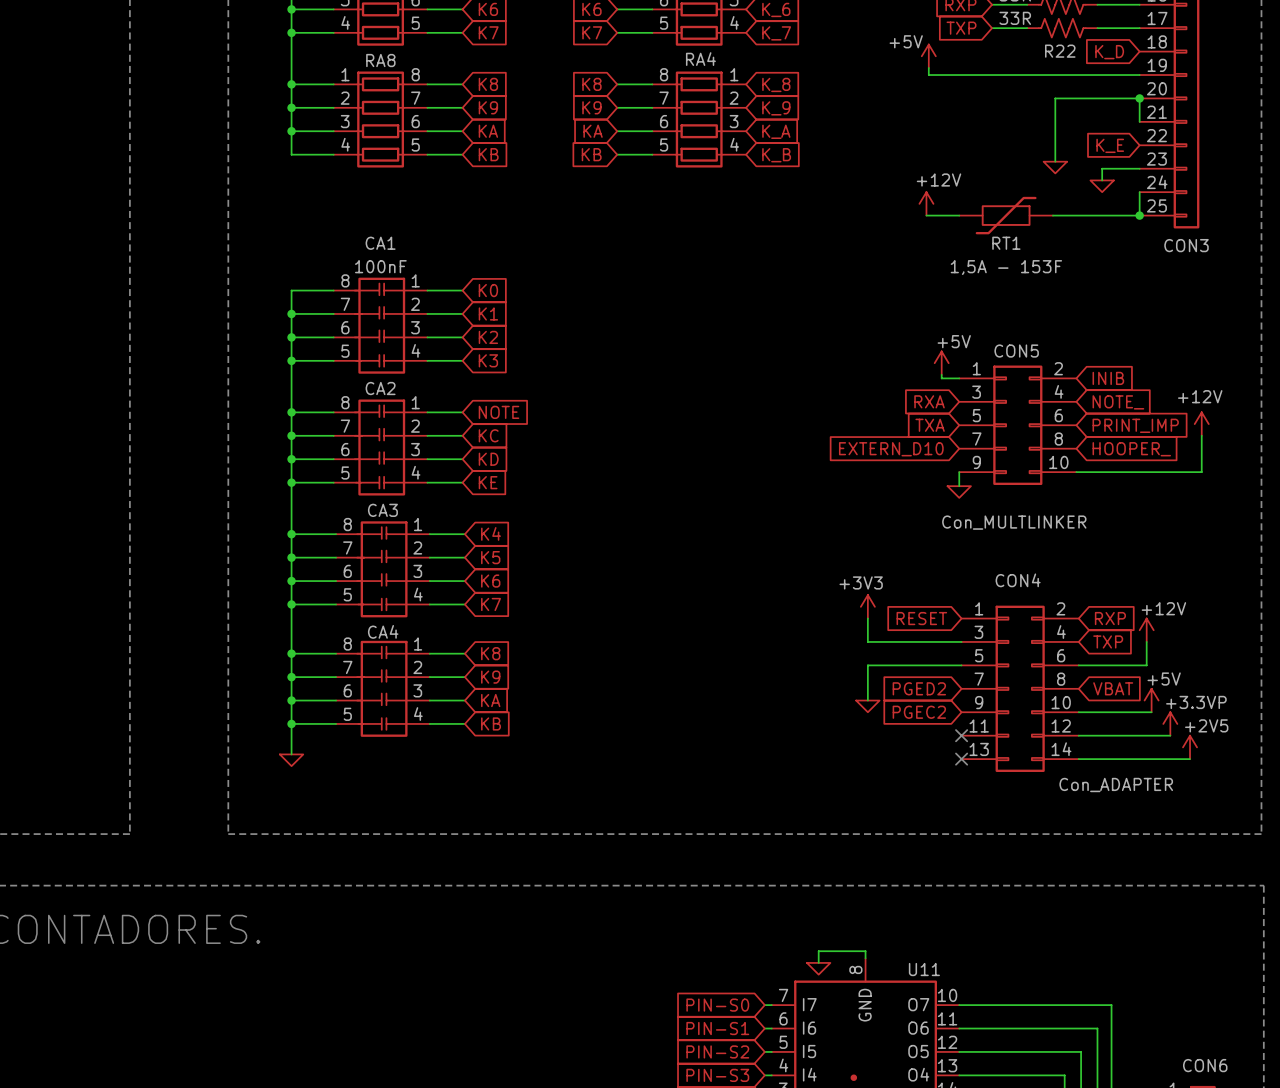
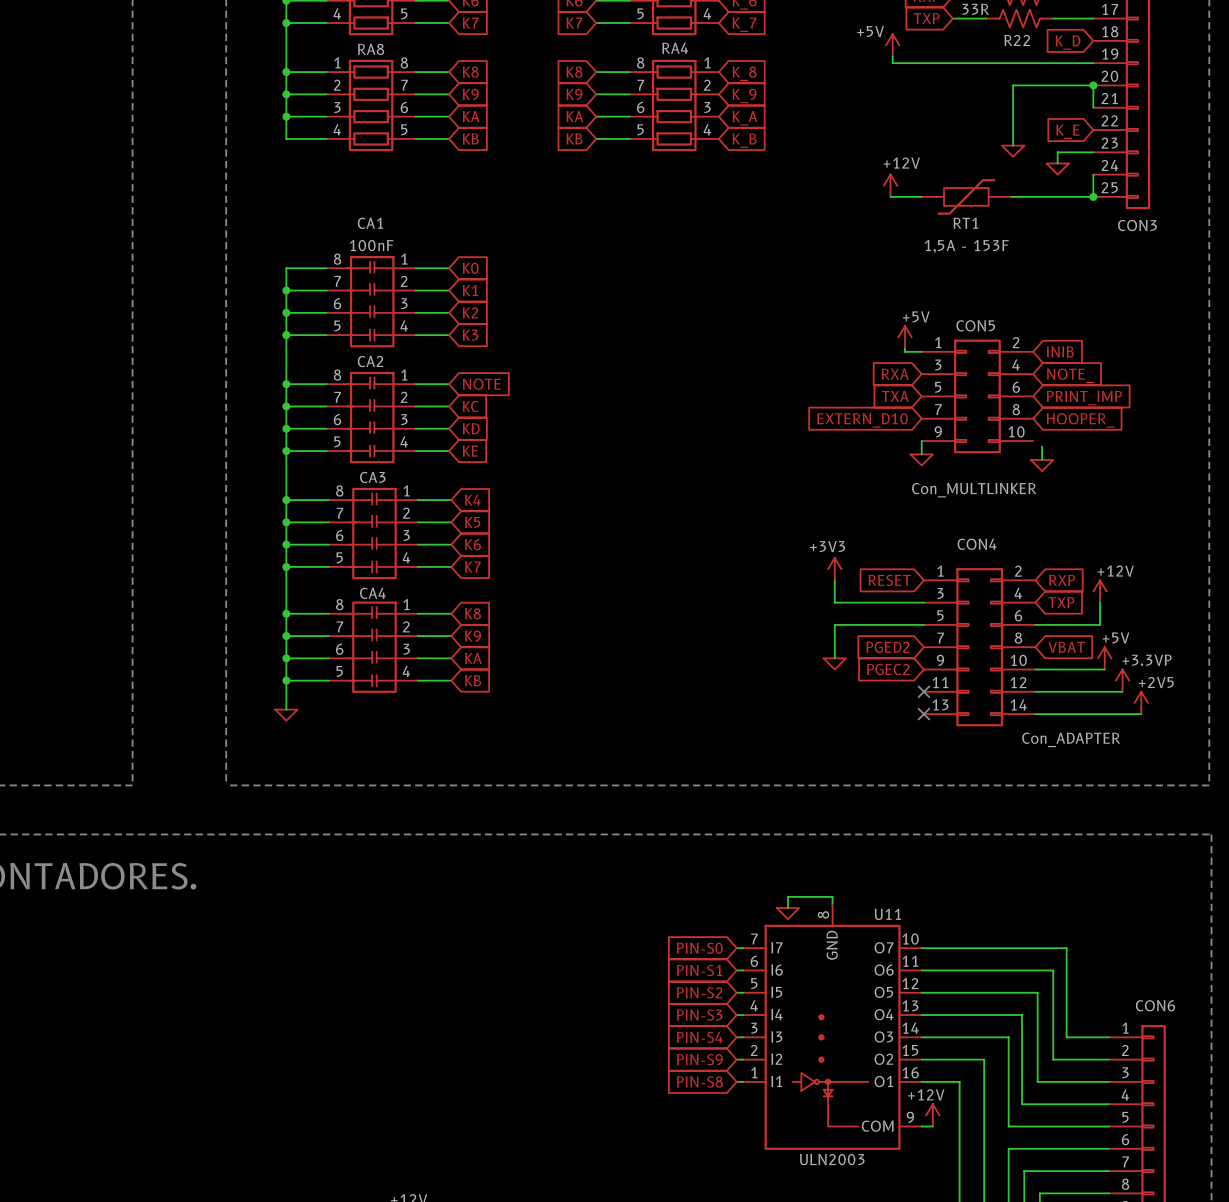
power symbol: +12V (1201, 424) -> none
wire: (1201, 435) (1201, 472) (1076, 472) -> none
wire: none -> (1042, 446) (1042, 459)
power symbol: none -> (1042, 465)

